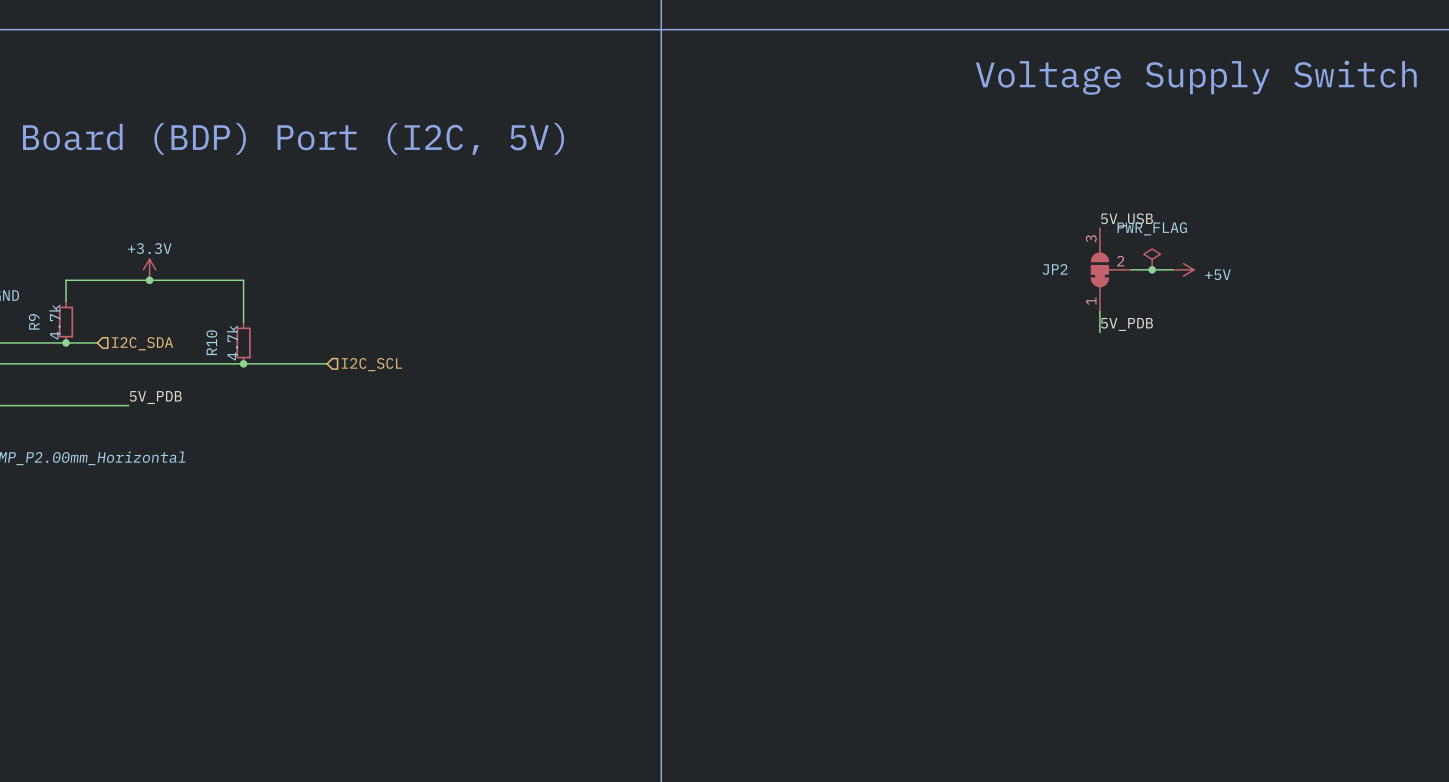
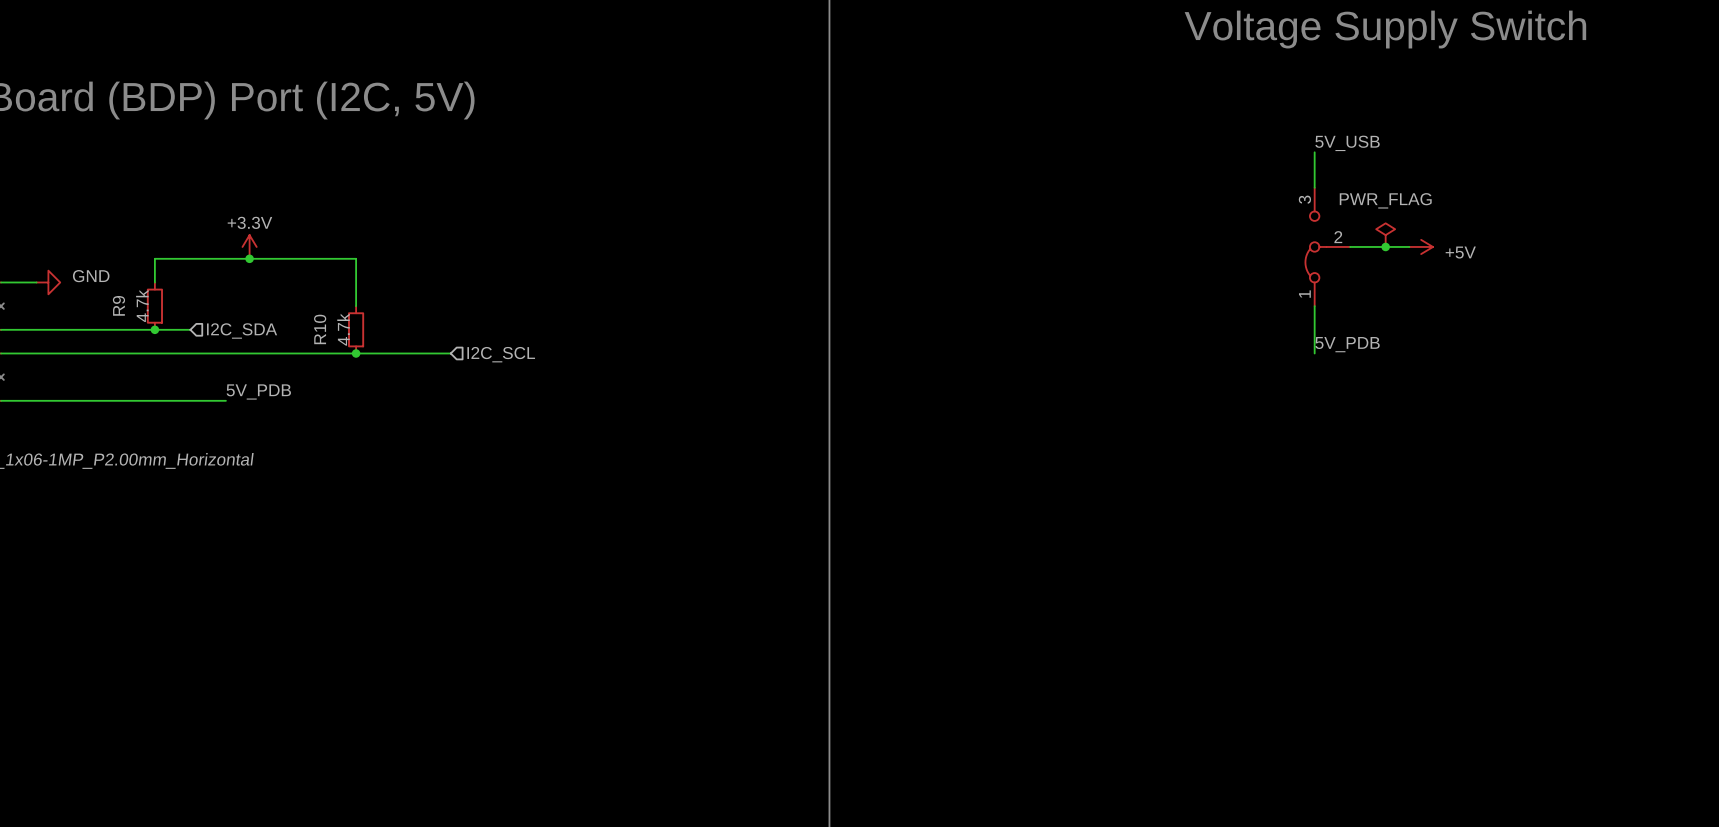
wire: none -> (1314, 152) (1314, 187)
label position: 5V_USB (1126, 219) -> 5V_USB (1347, 143)
part: none -> (1327, 246)
JP2: (1111, 269) -> none
wire: (1099, 311) (1099, 332) -> none
wire: none -> (1314, 306) (1314, 353)
label position: 5V_PDB (1126, 324) -> 5V_PDB (1347, 344)

